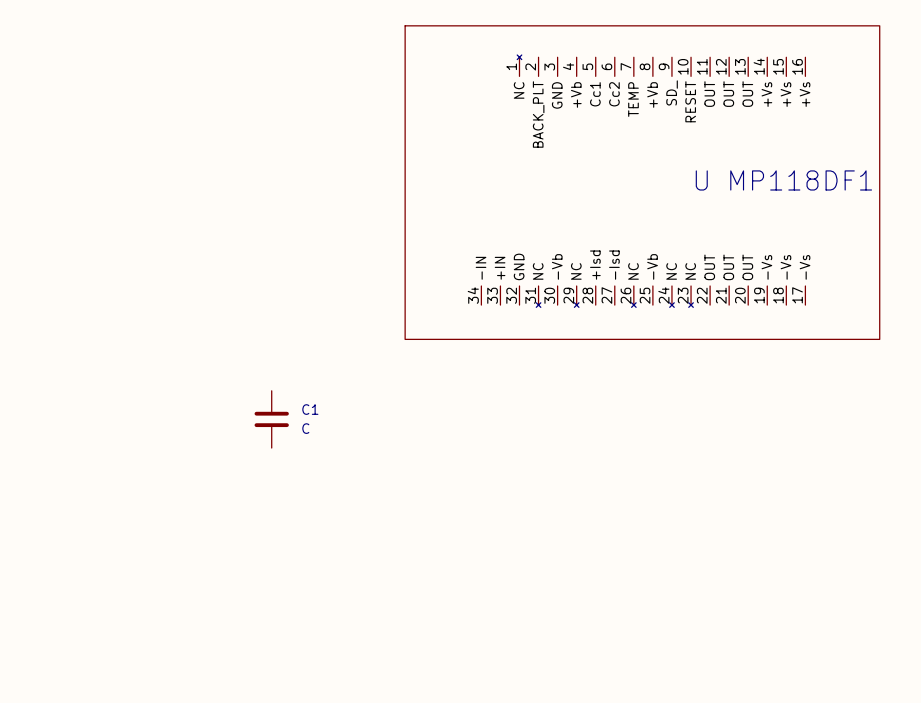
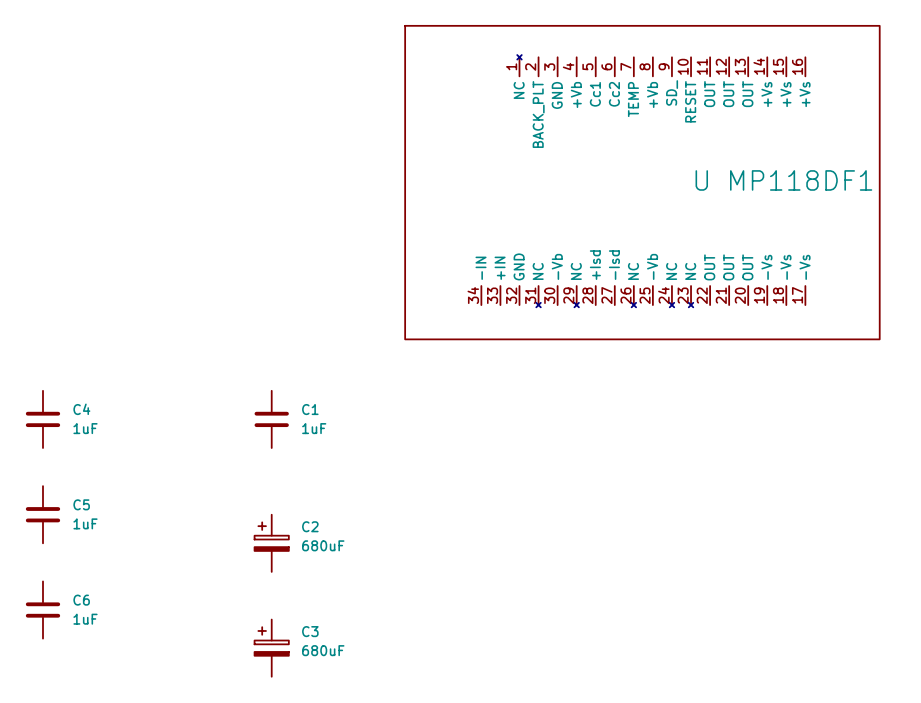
C4: none -> 1uF (42, 419)
C1 value: C (305, 428) -> 1uF (314, 428)
C5: none -> 1uF (42, 514)
C2: none -> 680uF (271, 543)
C6: none -> 1uF (42, 610)
C3: none -> 680uF (271, 648)

